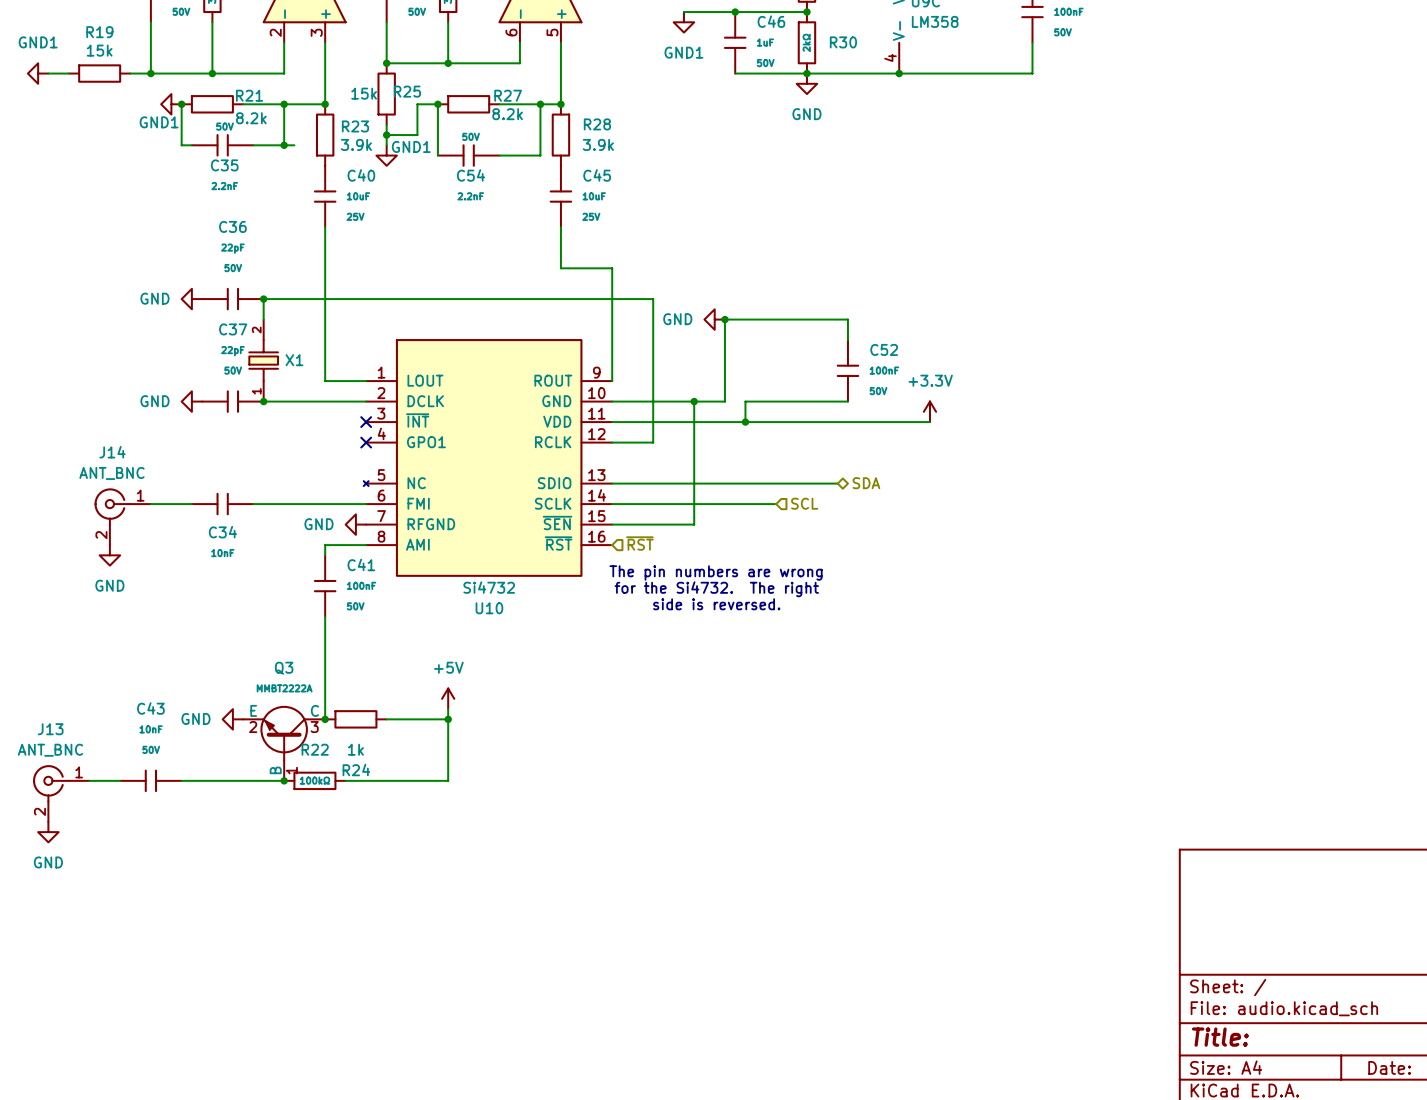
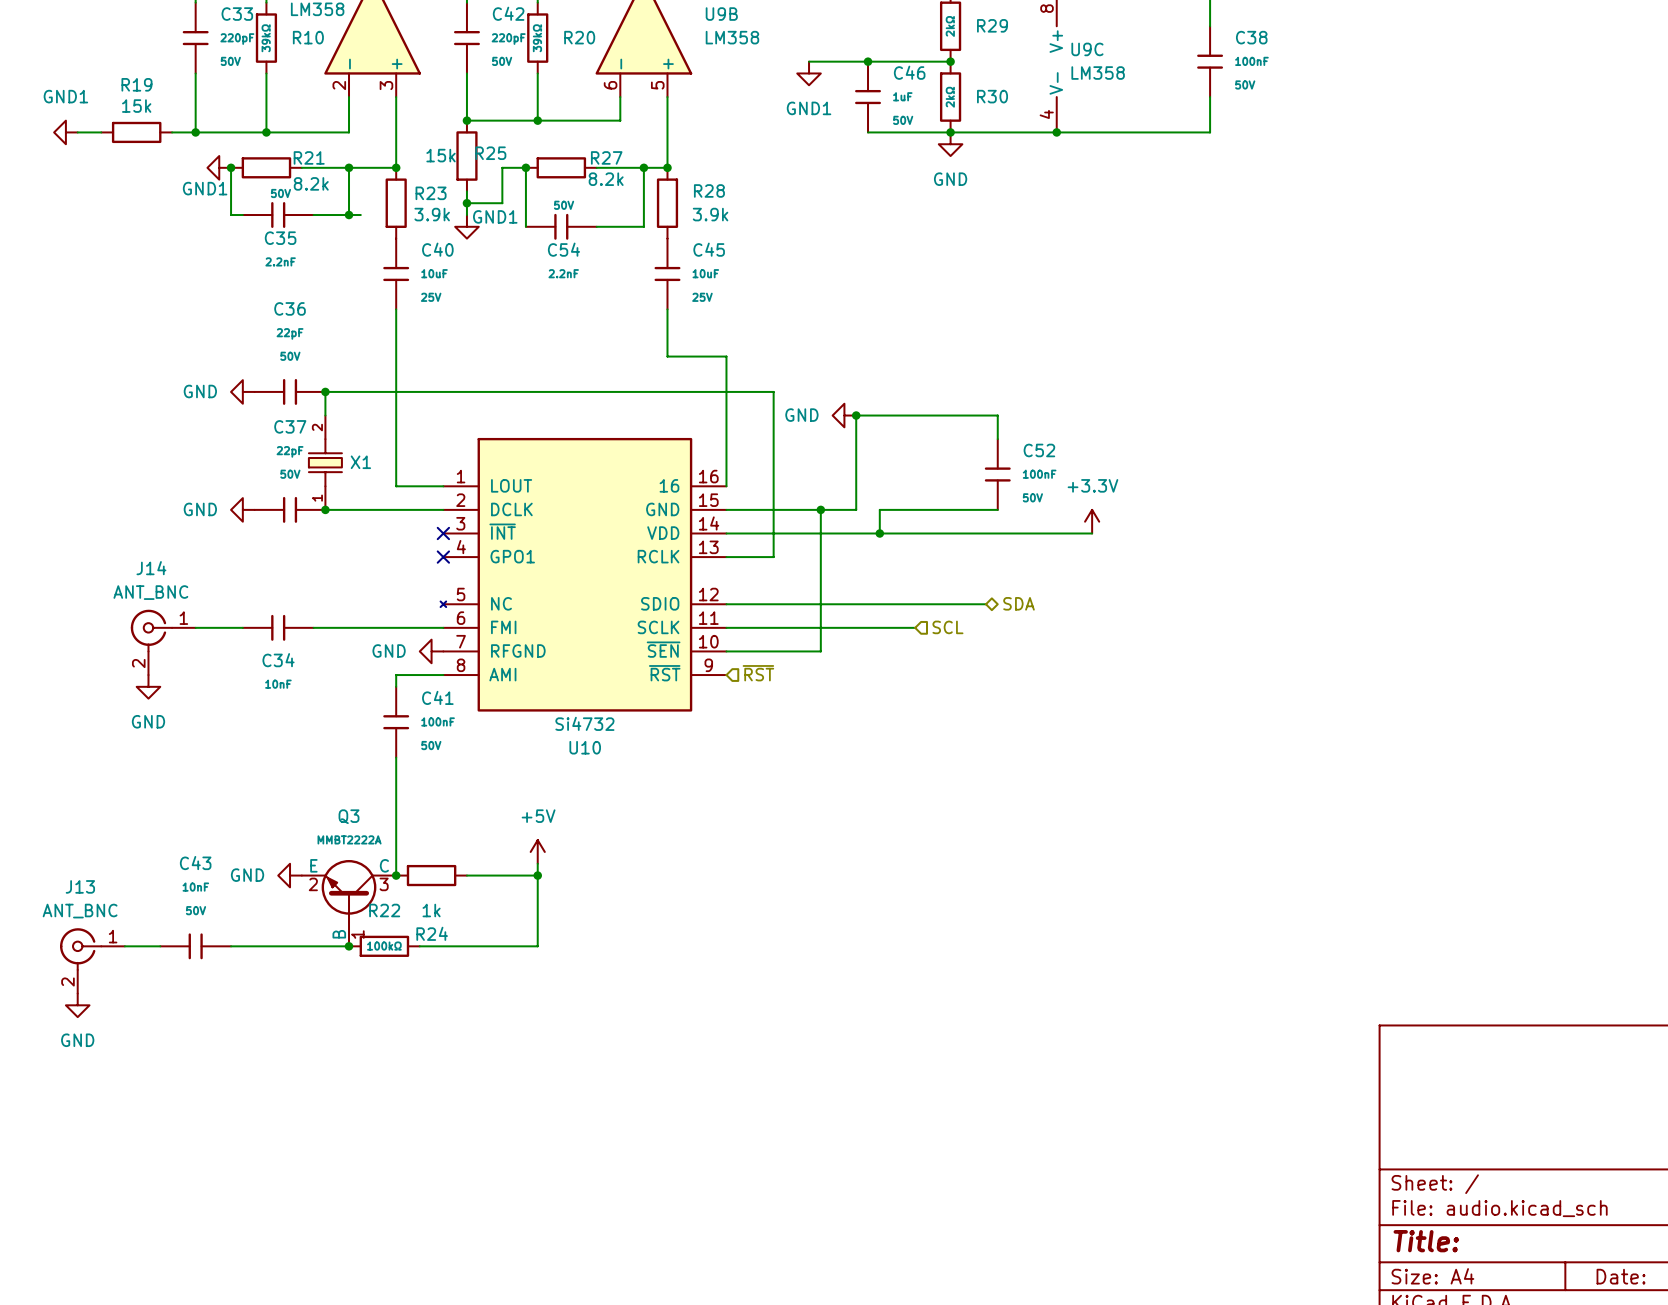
U10 symbol: [363, 339, 613, 577] -> [440, 437, 727, 712]
text: The pin numbers are wrong (716, 573) -> none
text: for the Si4732. The right (716, 589) -> none
text: side is reversed. (716, 604) -> none

